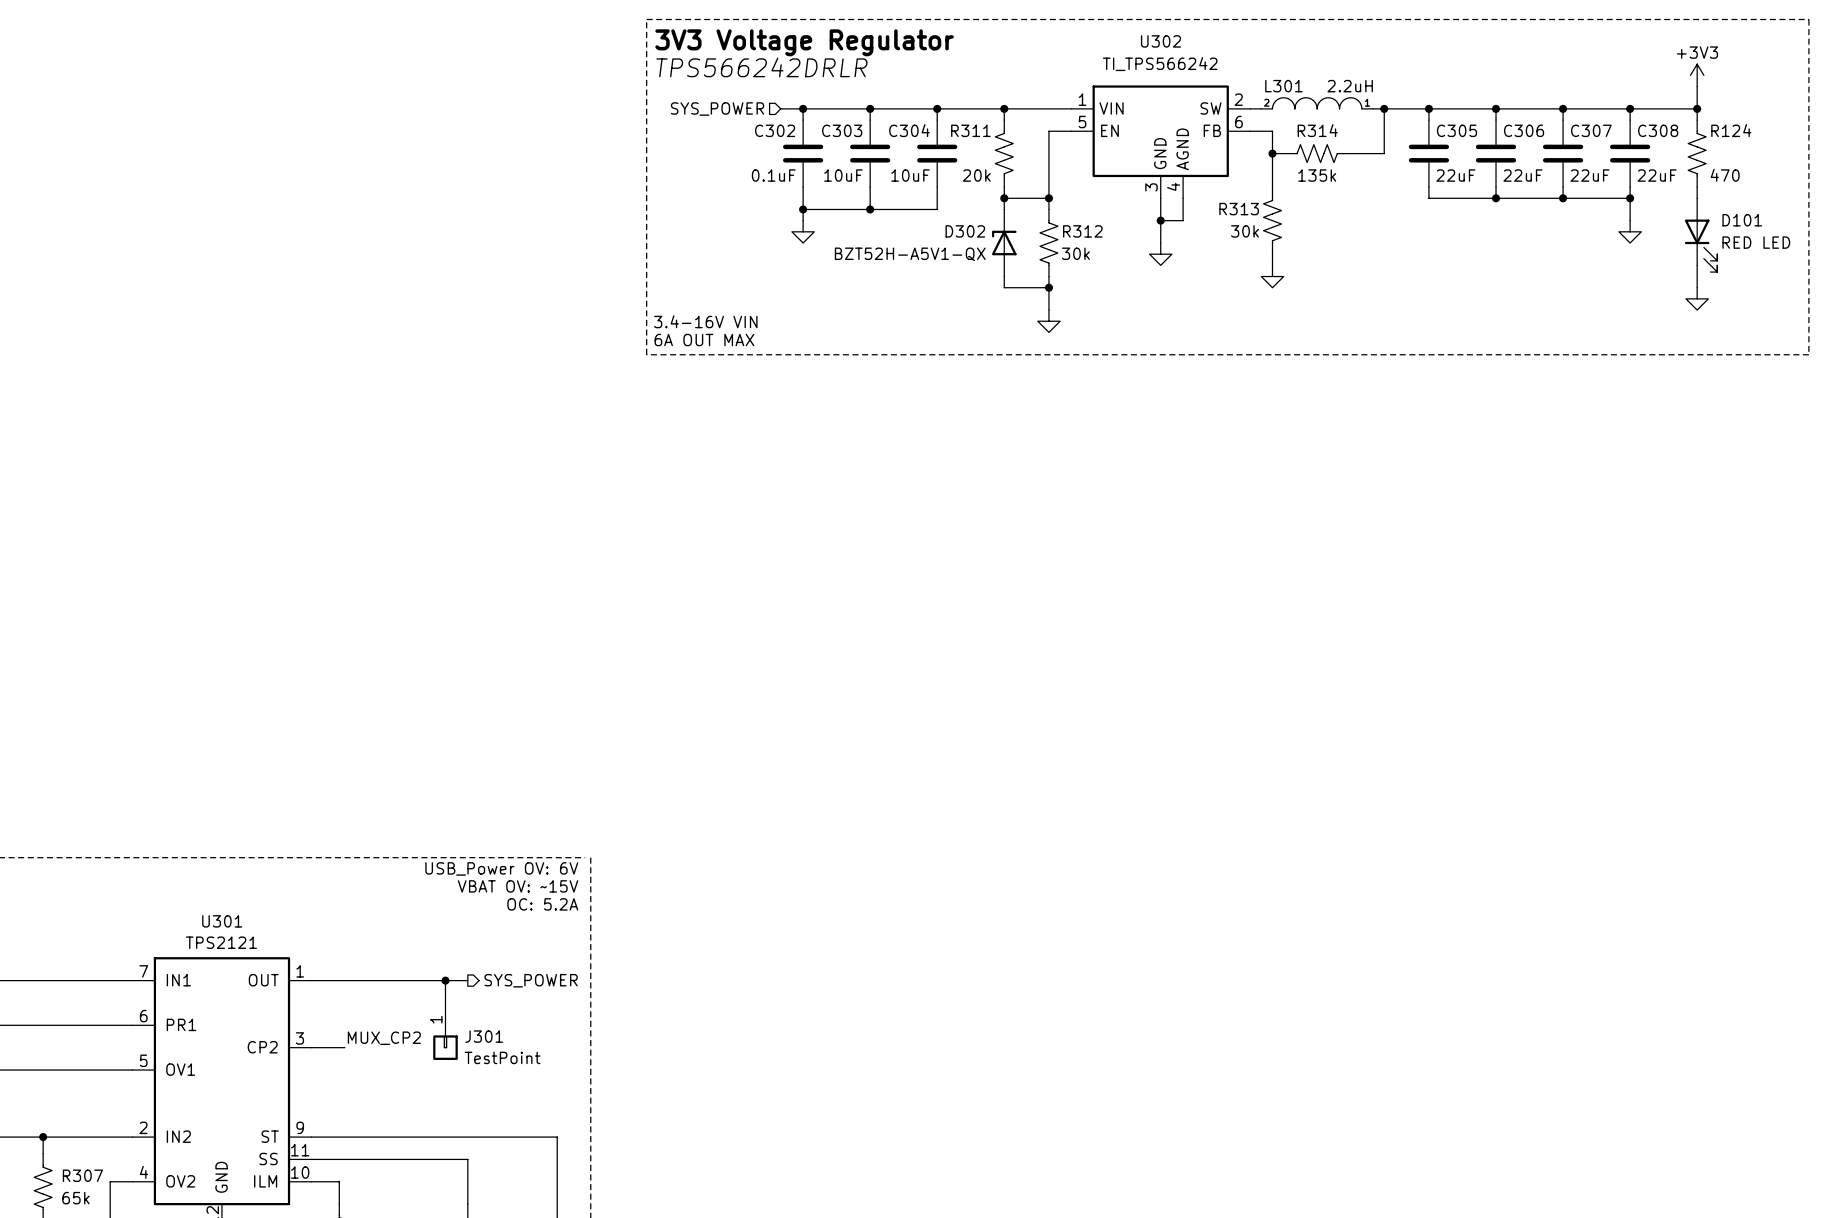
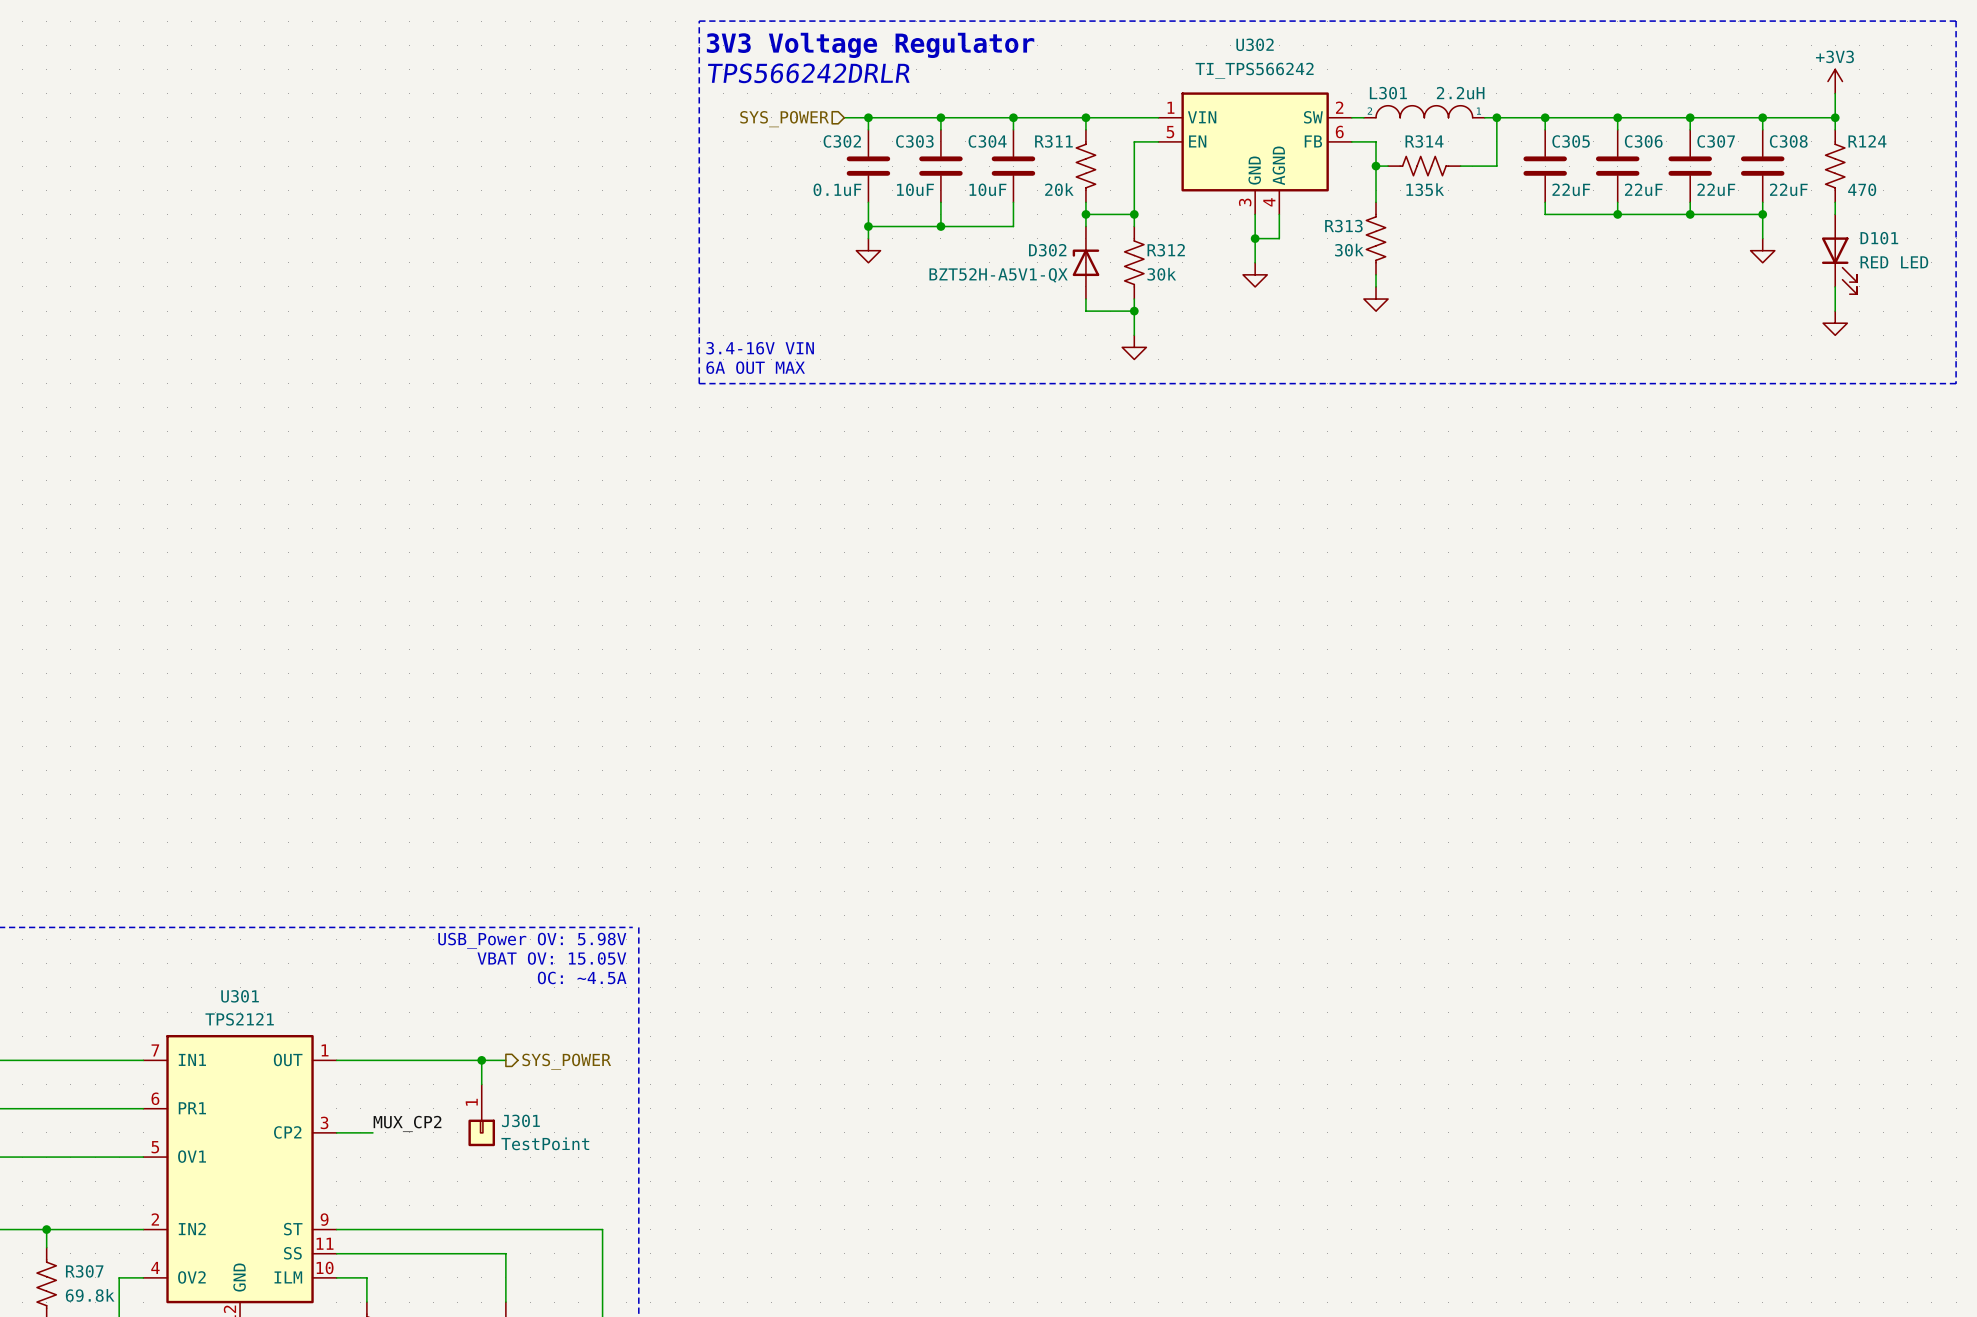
text: USB_Power OV: 6V (501, 868) -> USB_Power OV: 5.98V (532, 940)
text: VBAT OV: ~15V (518, 886) -> VBAT OV: 15.05V (551, 958)
text: OC: 5.2A (542, 904) -> OC: ~4.5A (582, 977)
R307 value: 65k (75, 1198) -> 69.8k (90, 1295)

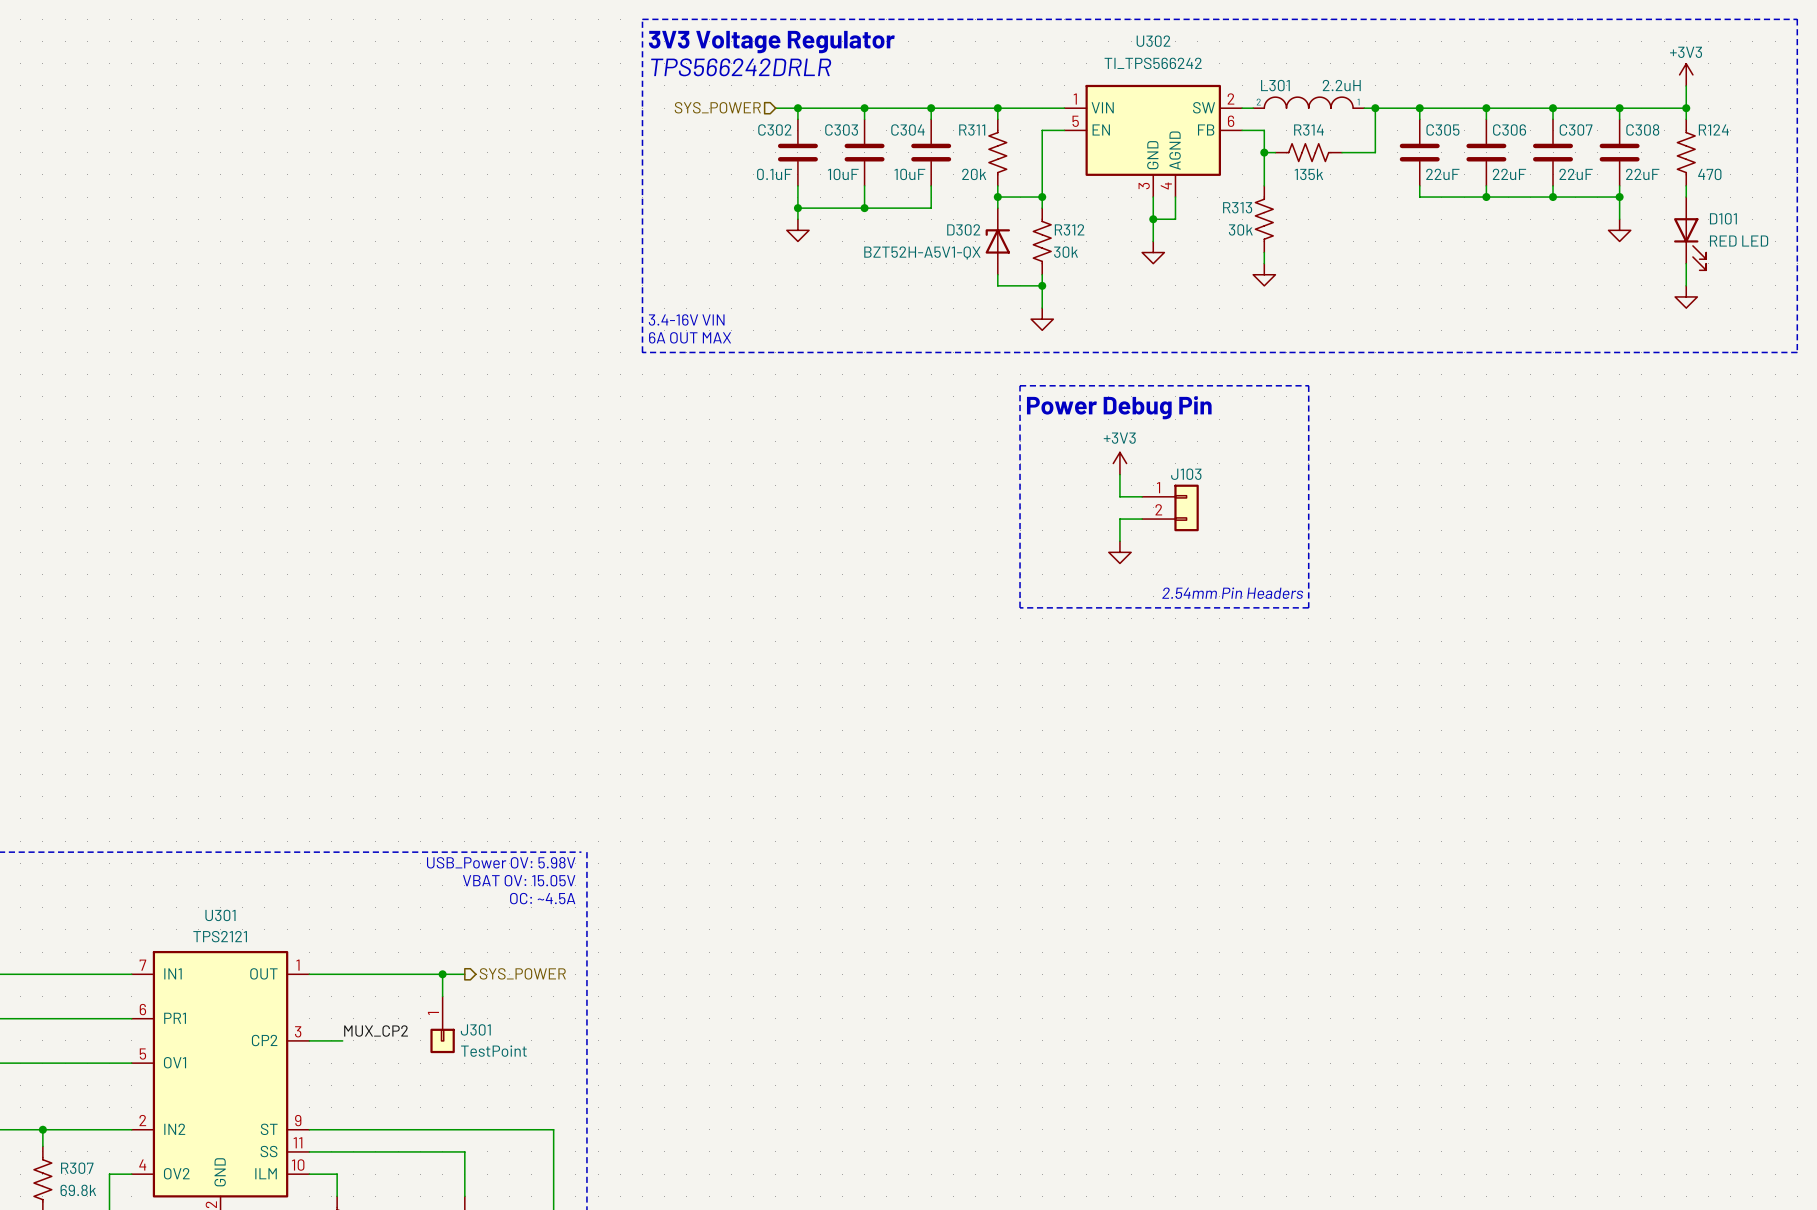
line: none -> (1020, 385) (1308, 385) (1308, 607) (1020, 607) (1020, 385)
text: none -> Power Debug Pin (1119, 407)
power symbol: none -> +3V3 (1119, 463)
wire: none -> (1119, 474) (1119, 496) (1142, 496)
J103: none -> (1170, 507)
wire: none -> (1142, 519) (1119, 519) (1119, 541)
power symbol: none -> (1119, 552)
text: none -> 2.54mm Pin Headers (1232, 593)

